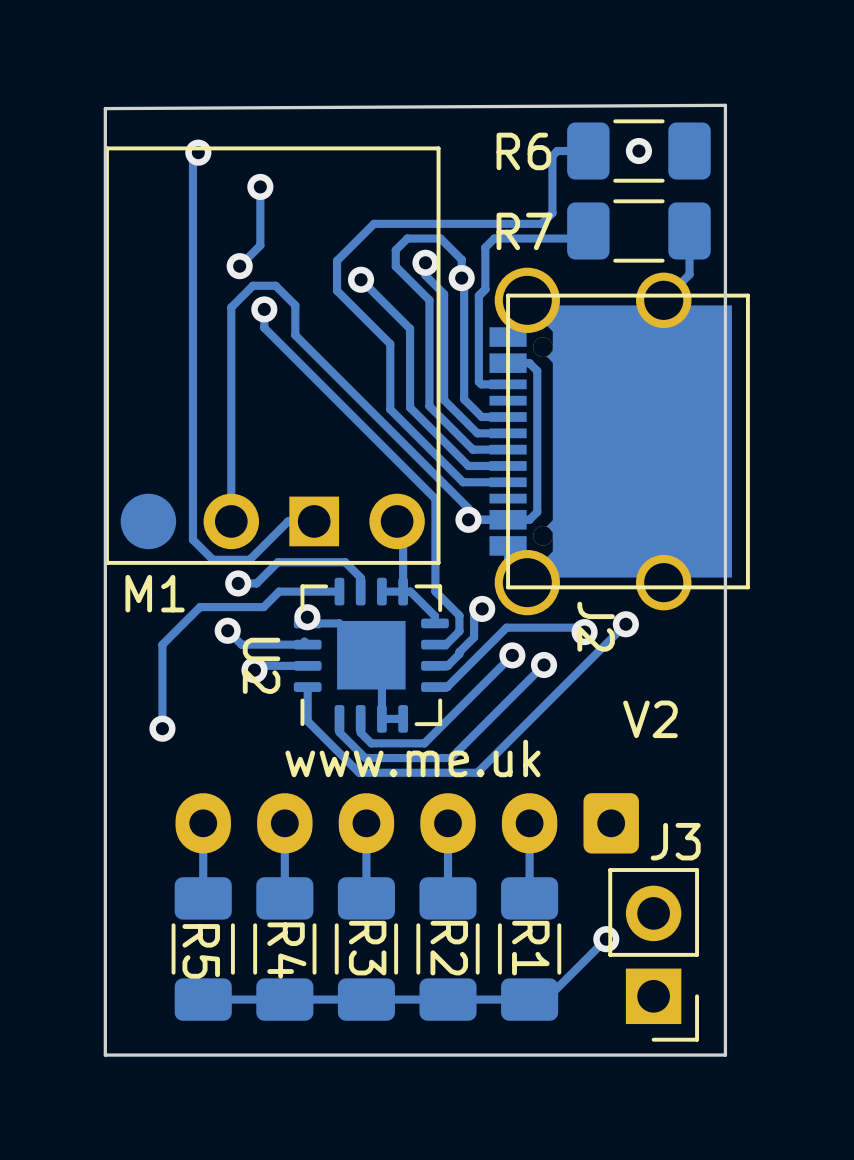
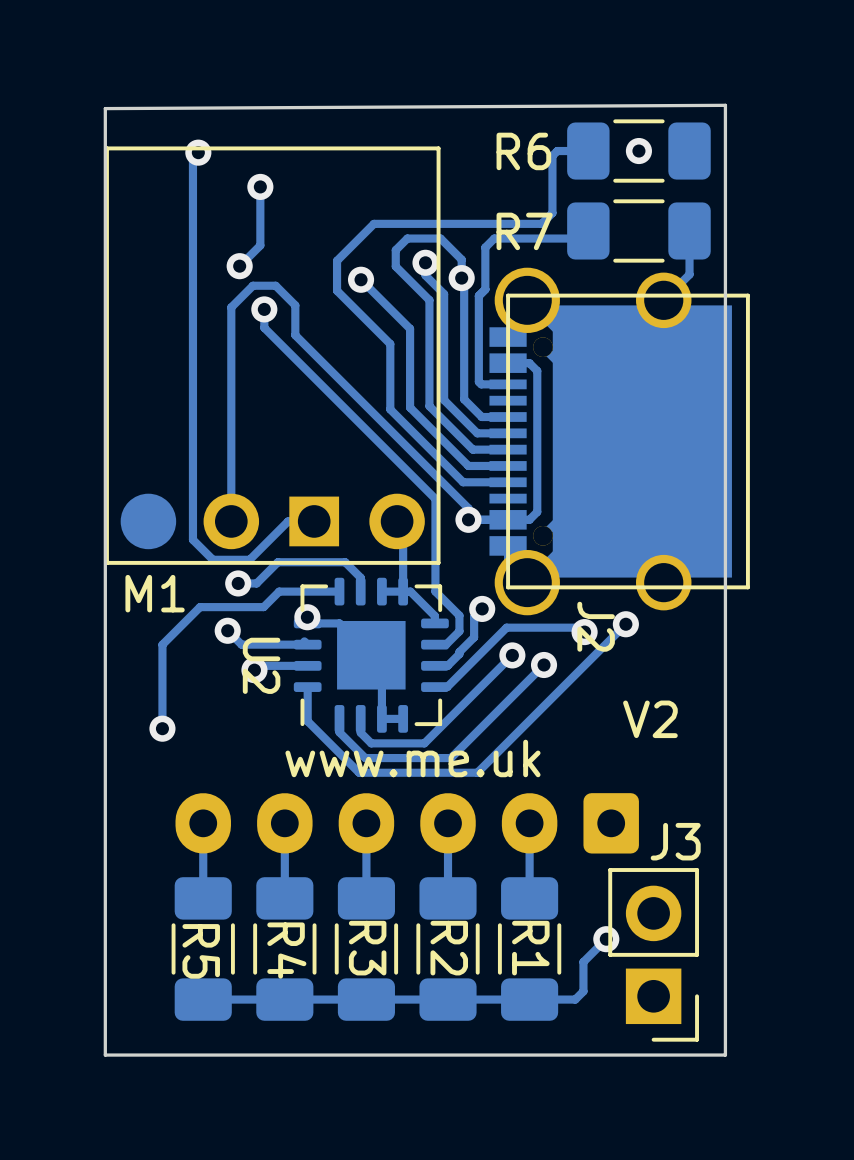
track: (583, 962) (545, 999) -> (583, 962) (583, 991) (575, 999) (545, 999)

